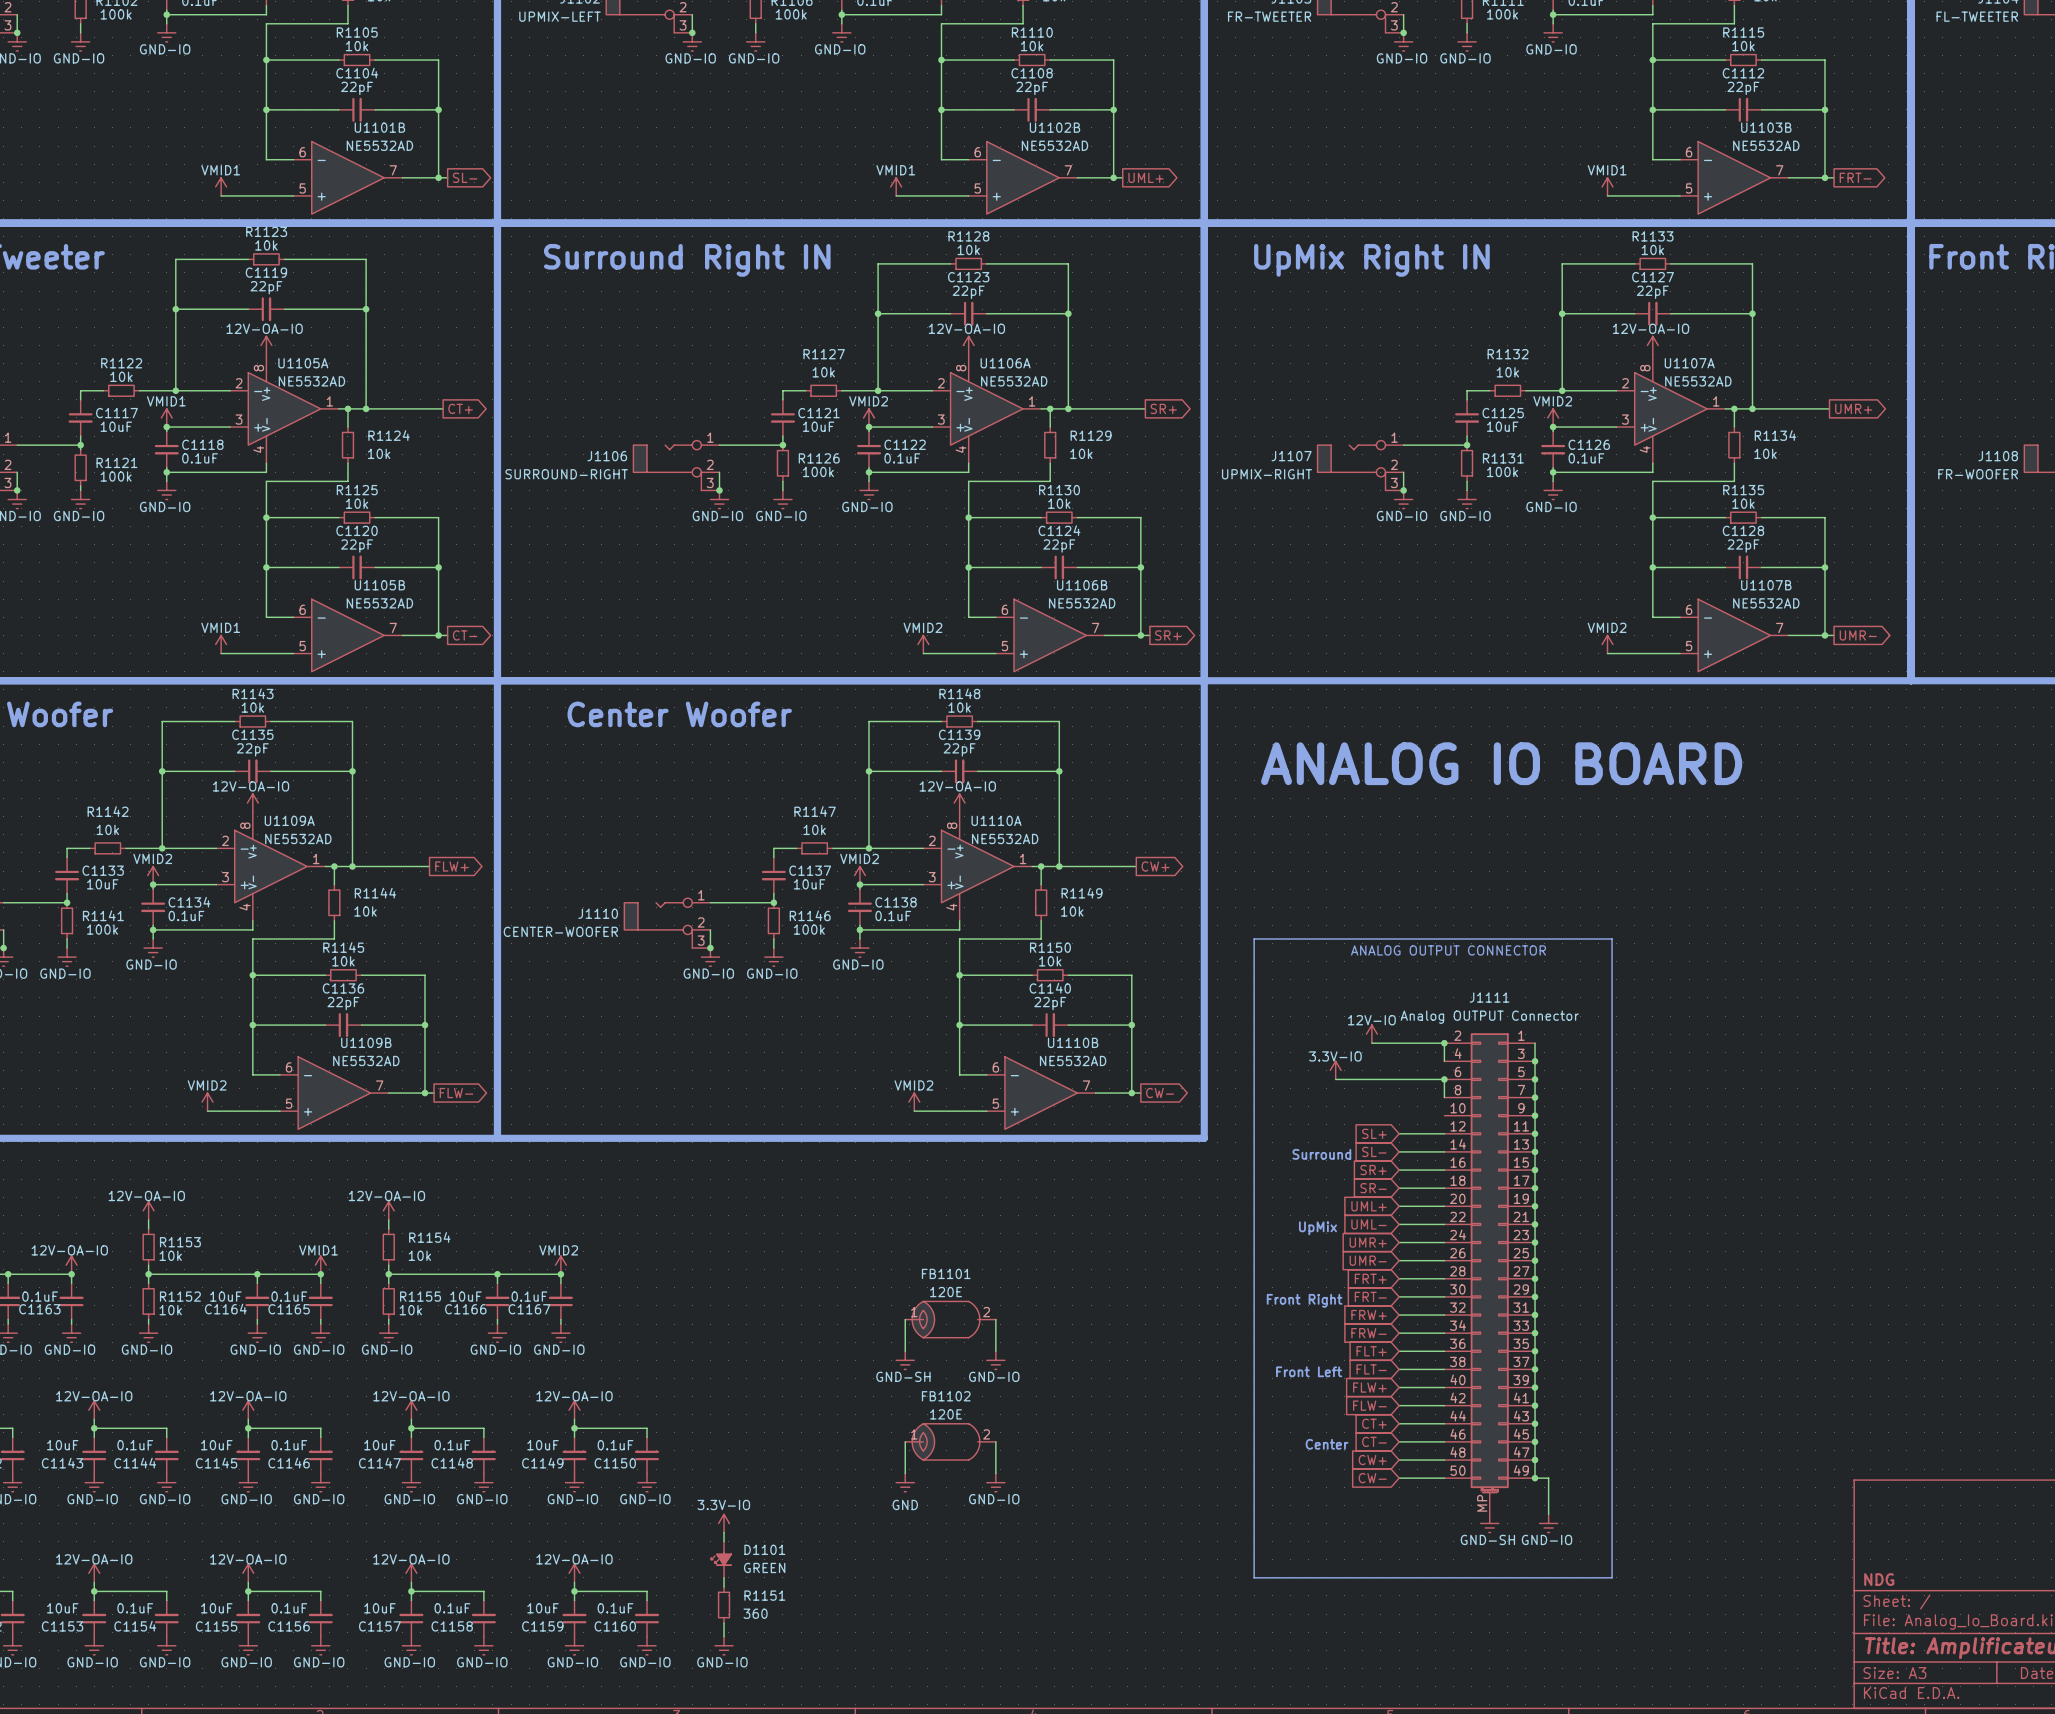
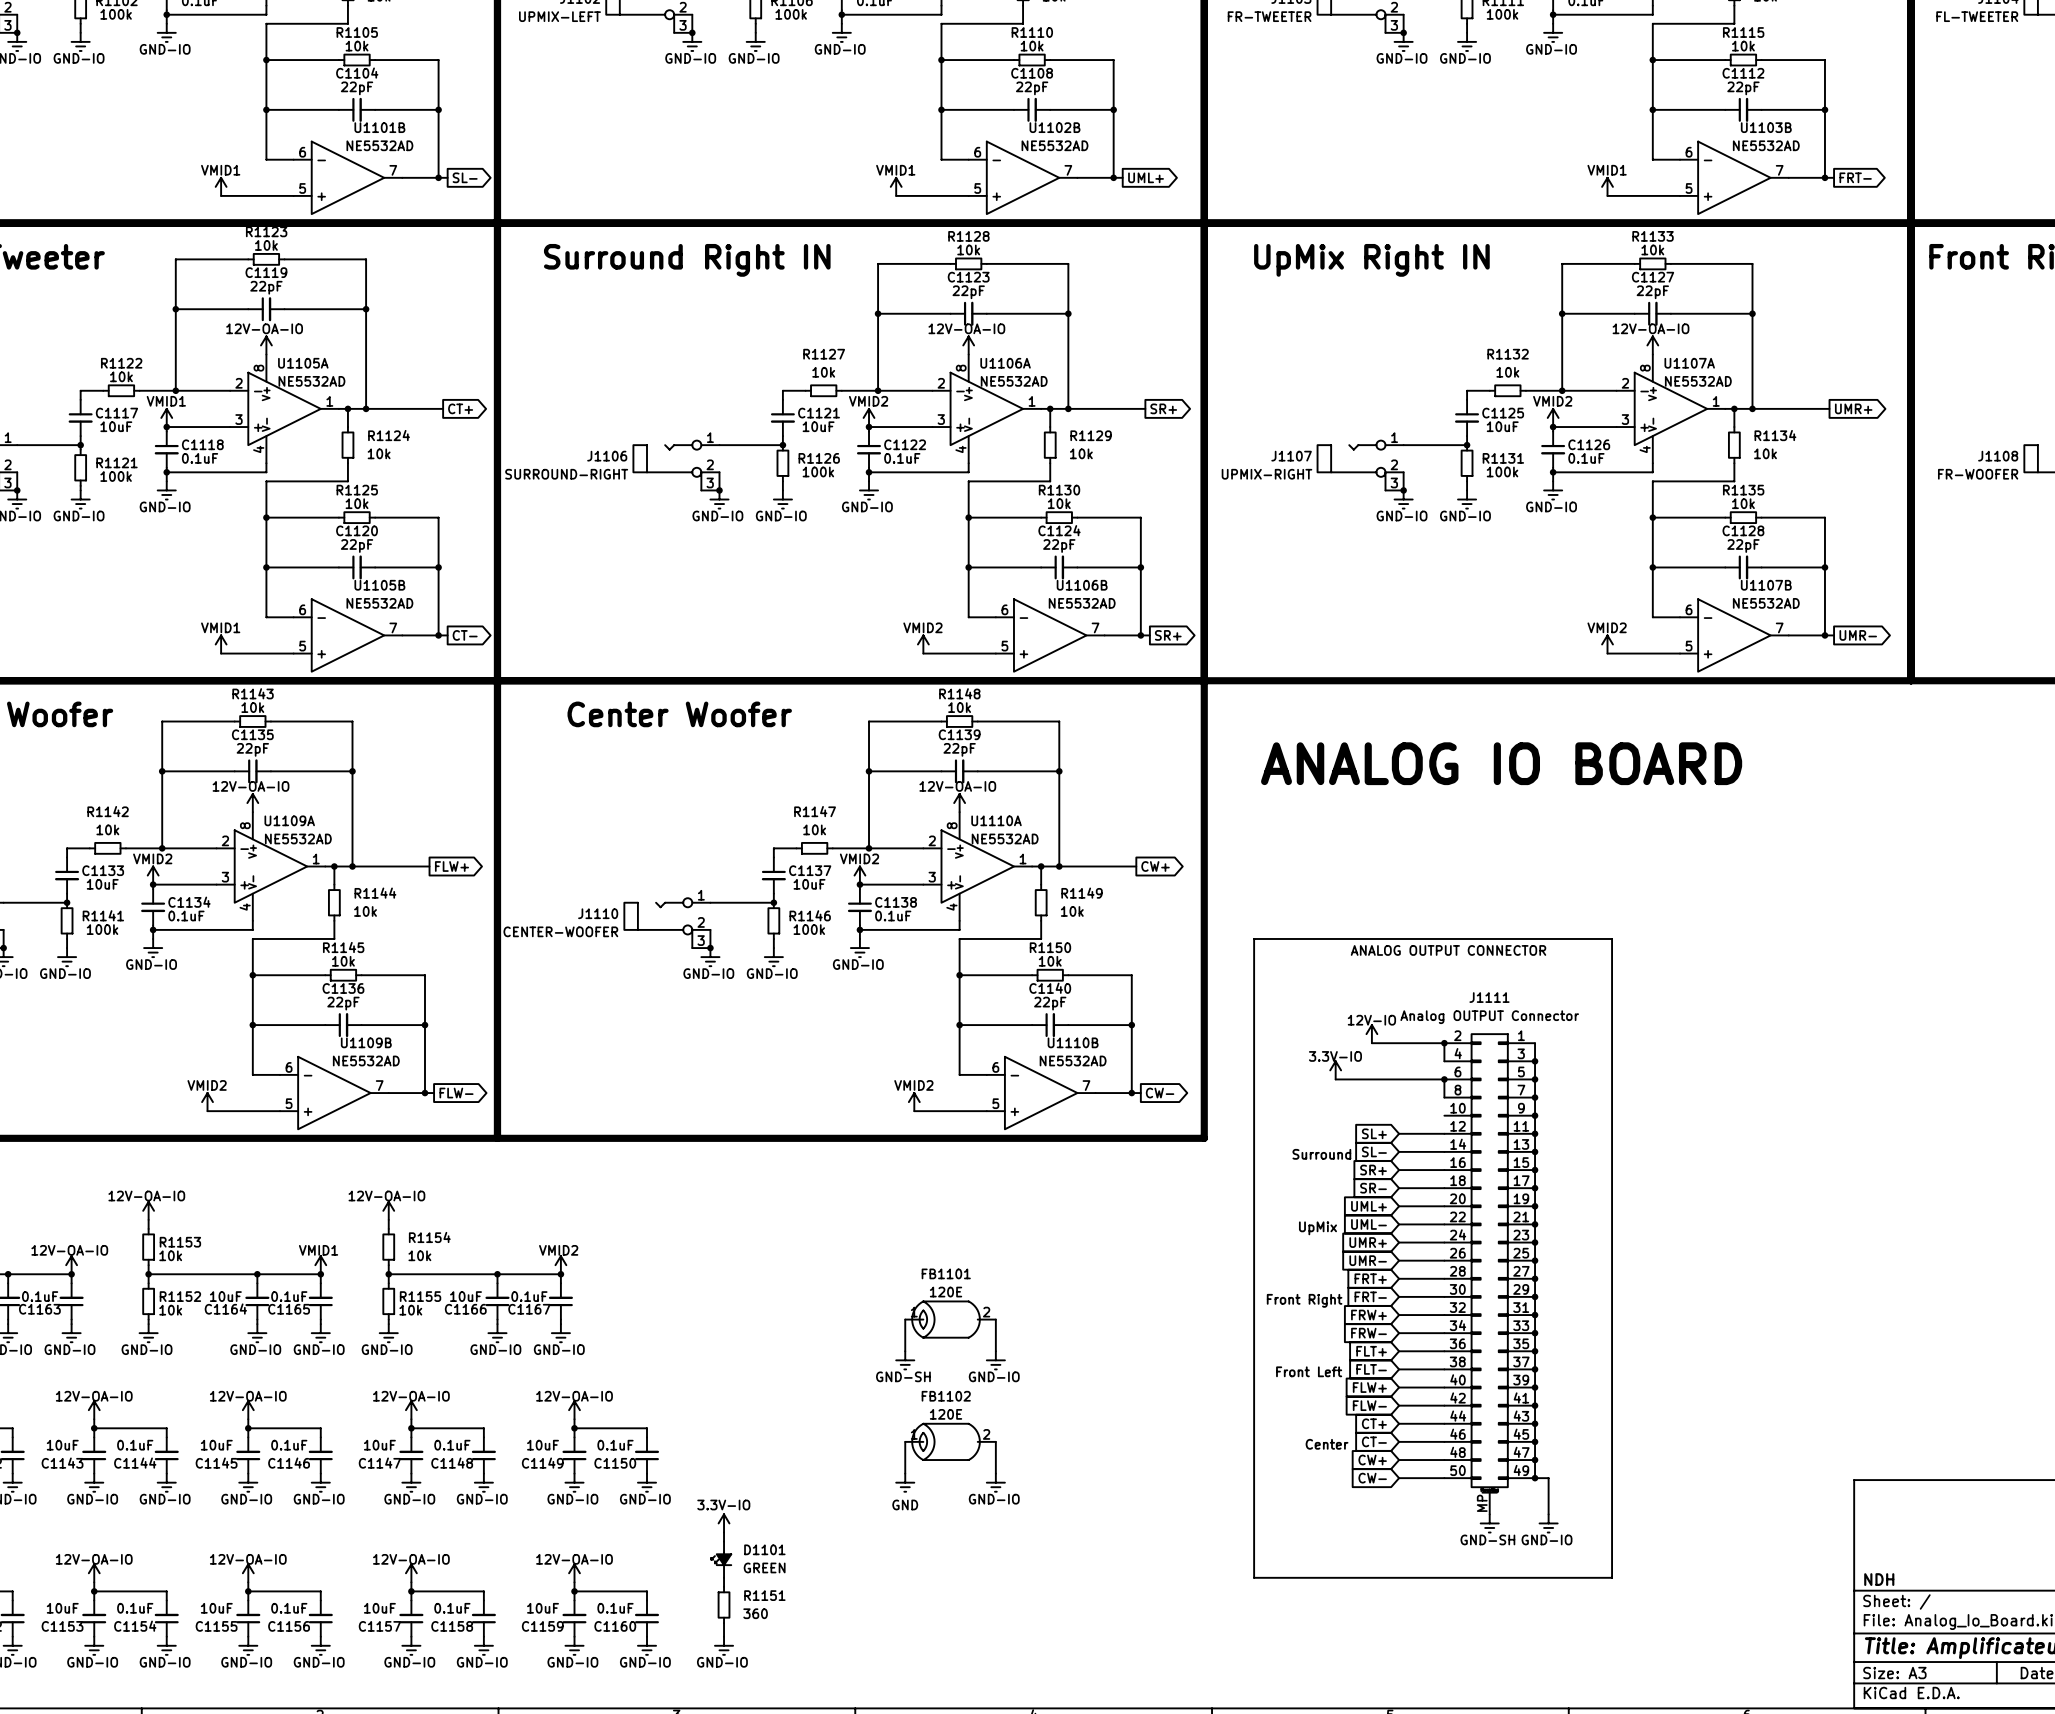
title block: NDG (1879, 1579) -> NDH (1879, 1579)

